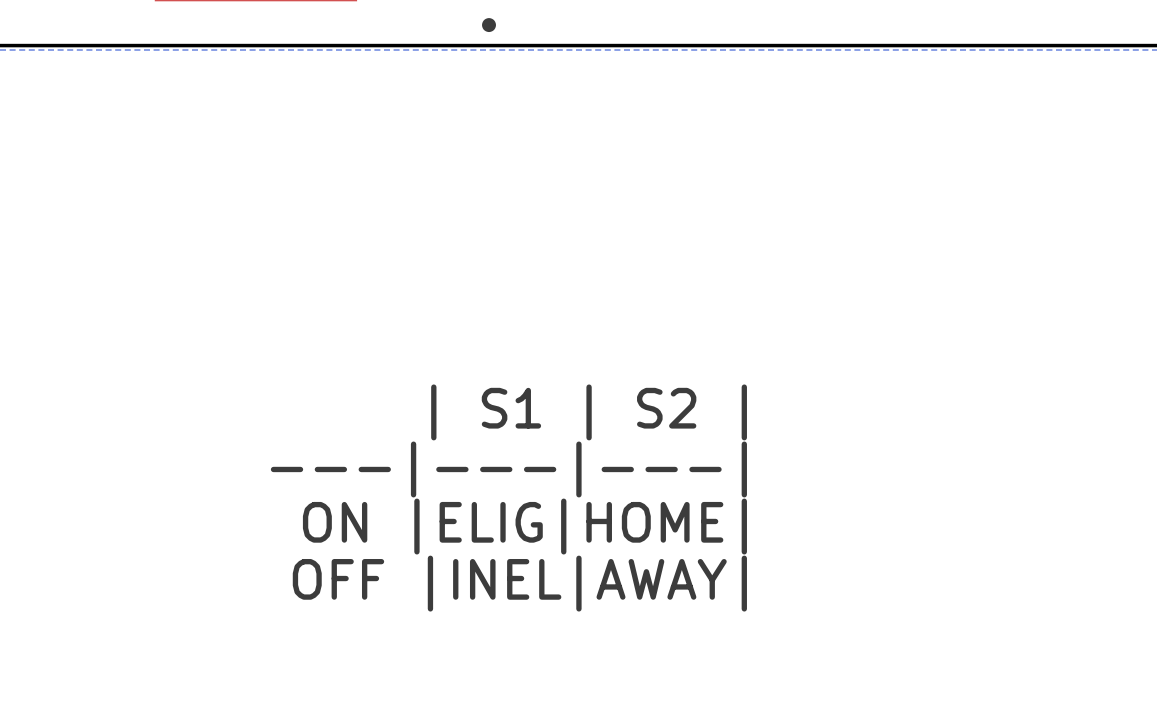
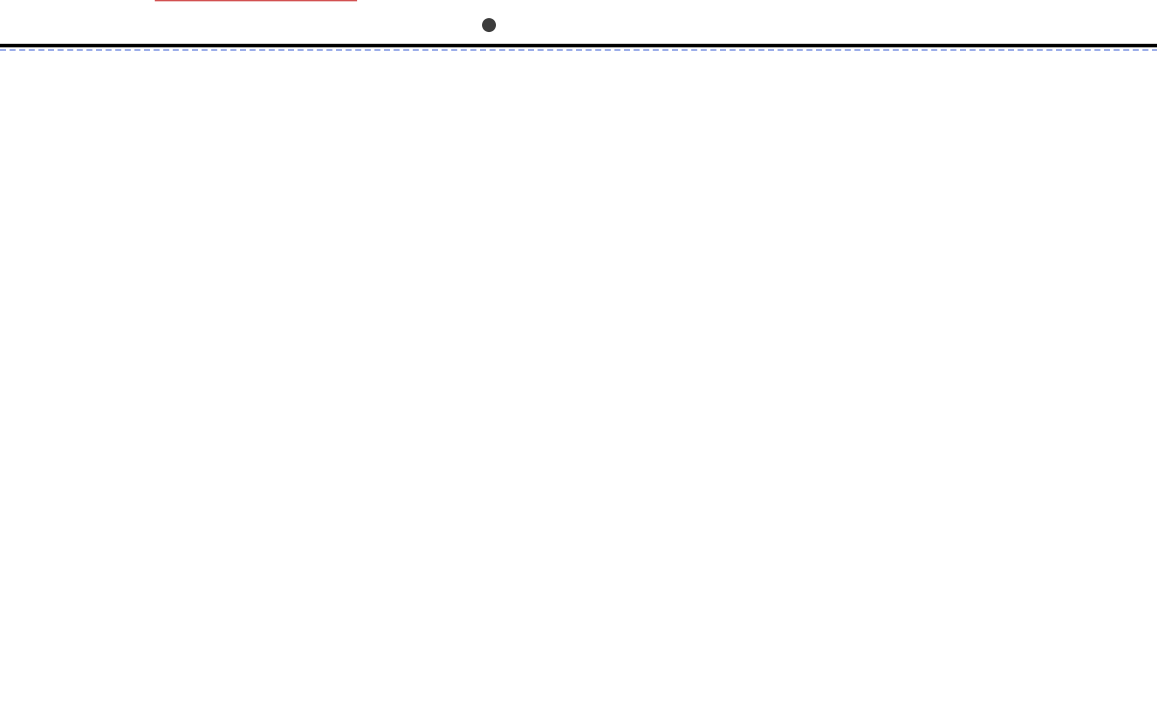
text: | S1 | S2 | (589, 412) -> none
text: ---|---|---| (508, 469) -> none
text: ON |ELIG|HOME| (524, 526) -> none
text: OFF |INEL|AWAY| (519, 583) -> none

